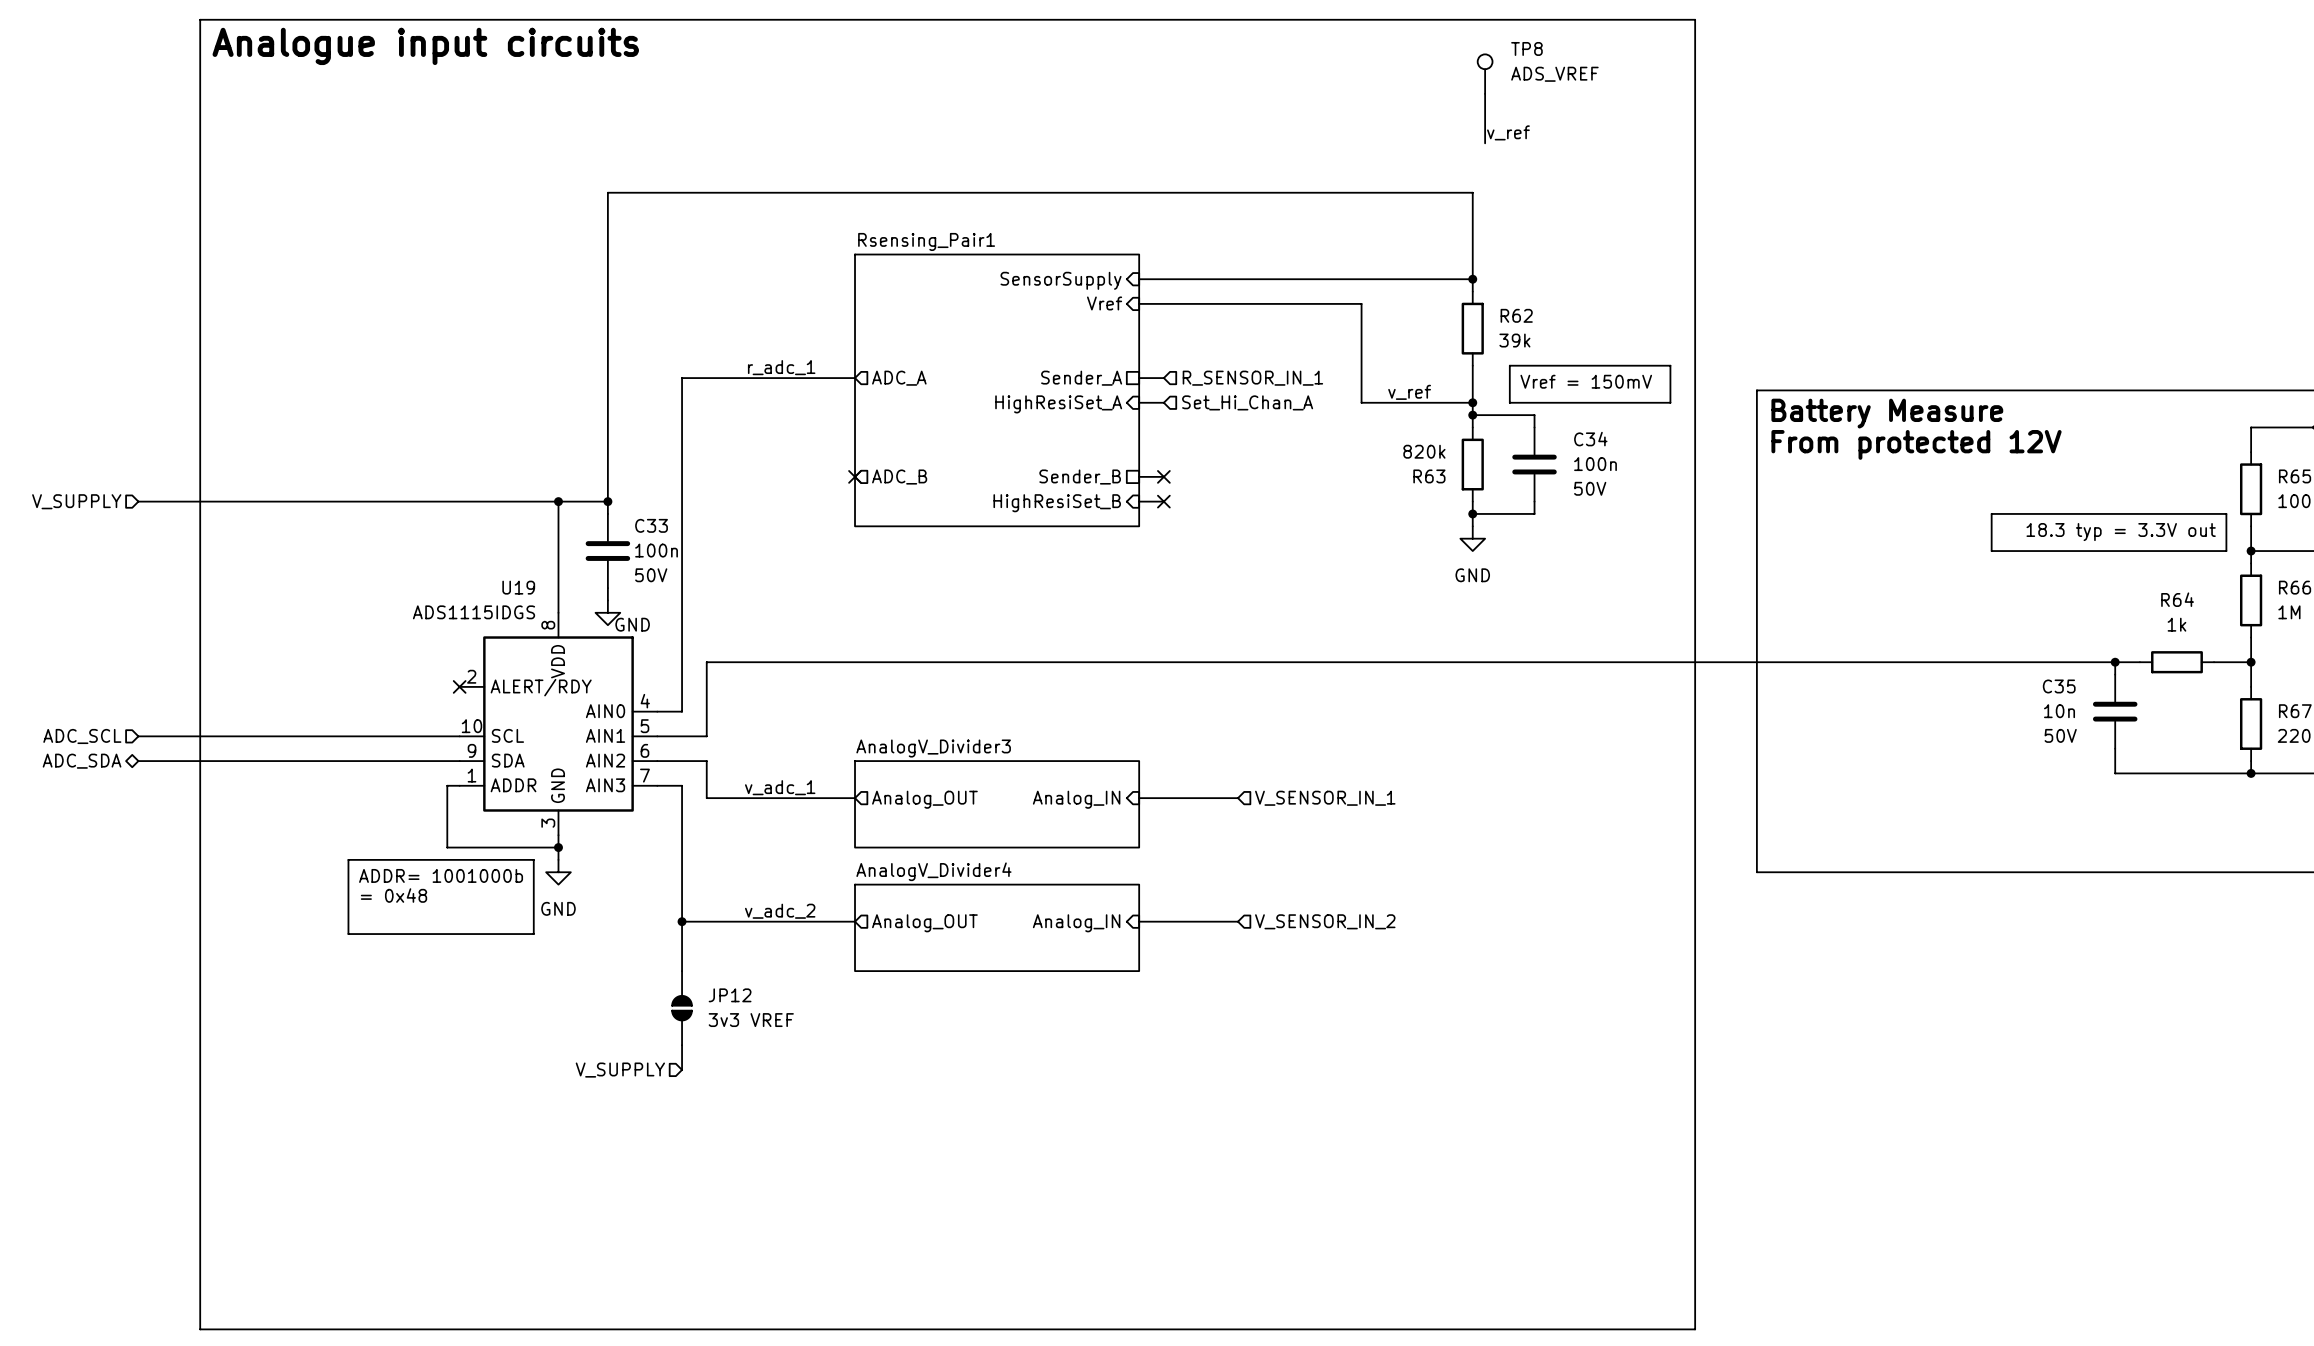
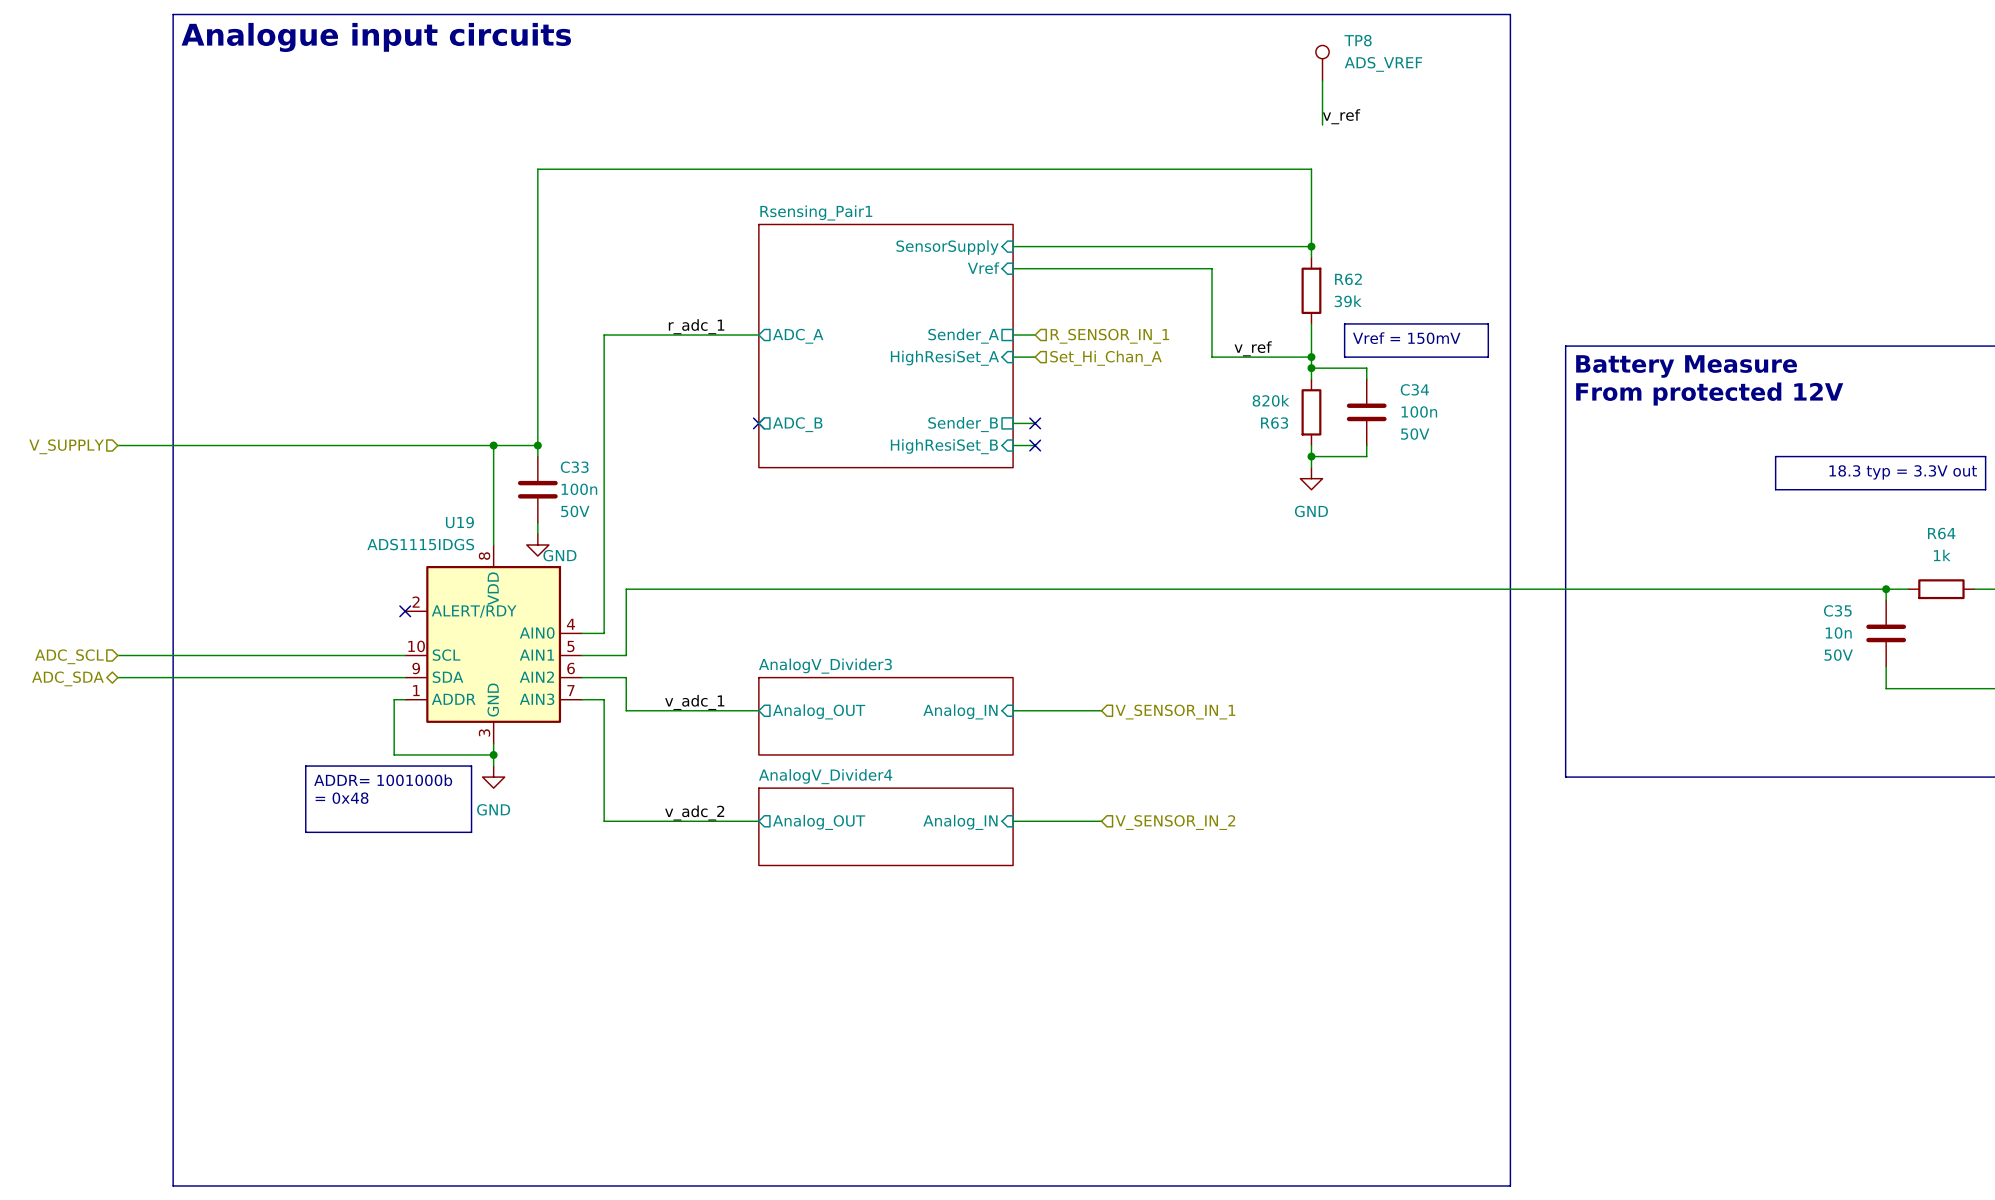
wire: (682, 921) (682, 971) -> none
junction: (682, 921) -> none
JP12: 3v3 VREF (682, 1008) -> none
wire: (682, 1045) (682, 1069) -> none
hierarchical label: V_SUPPLY (620, 1070) -> none

